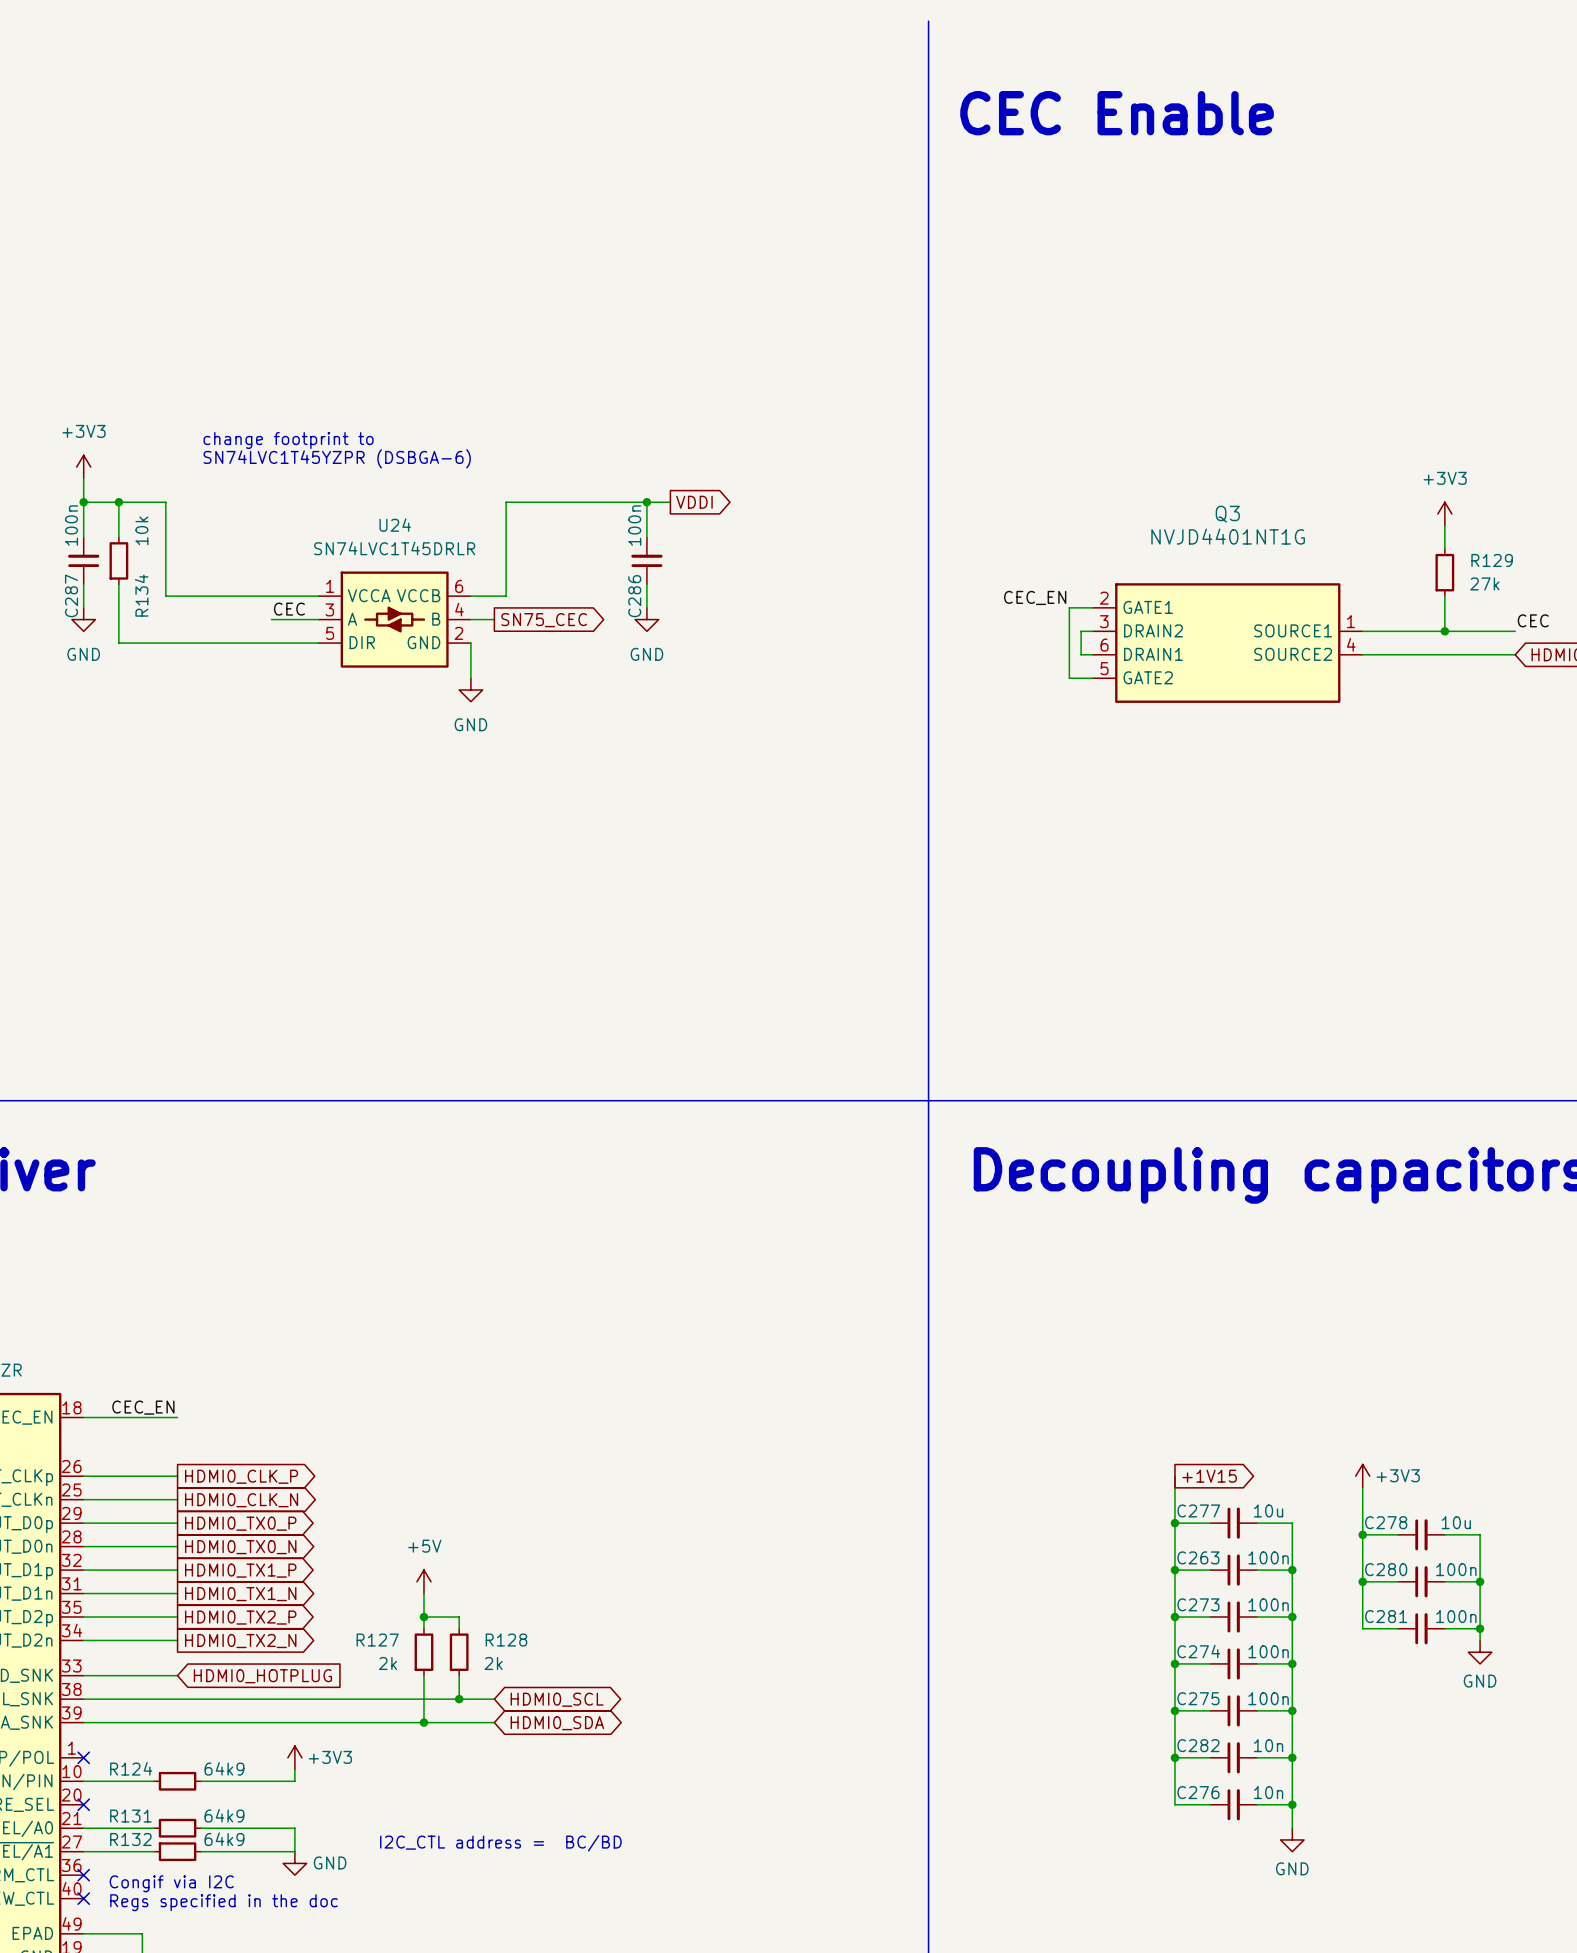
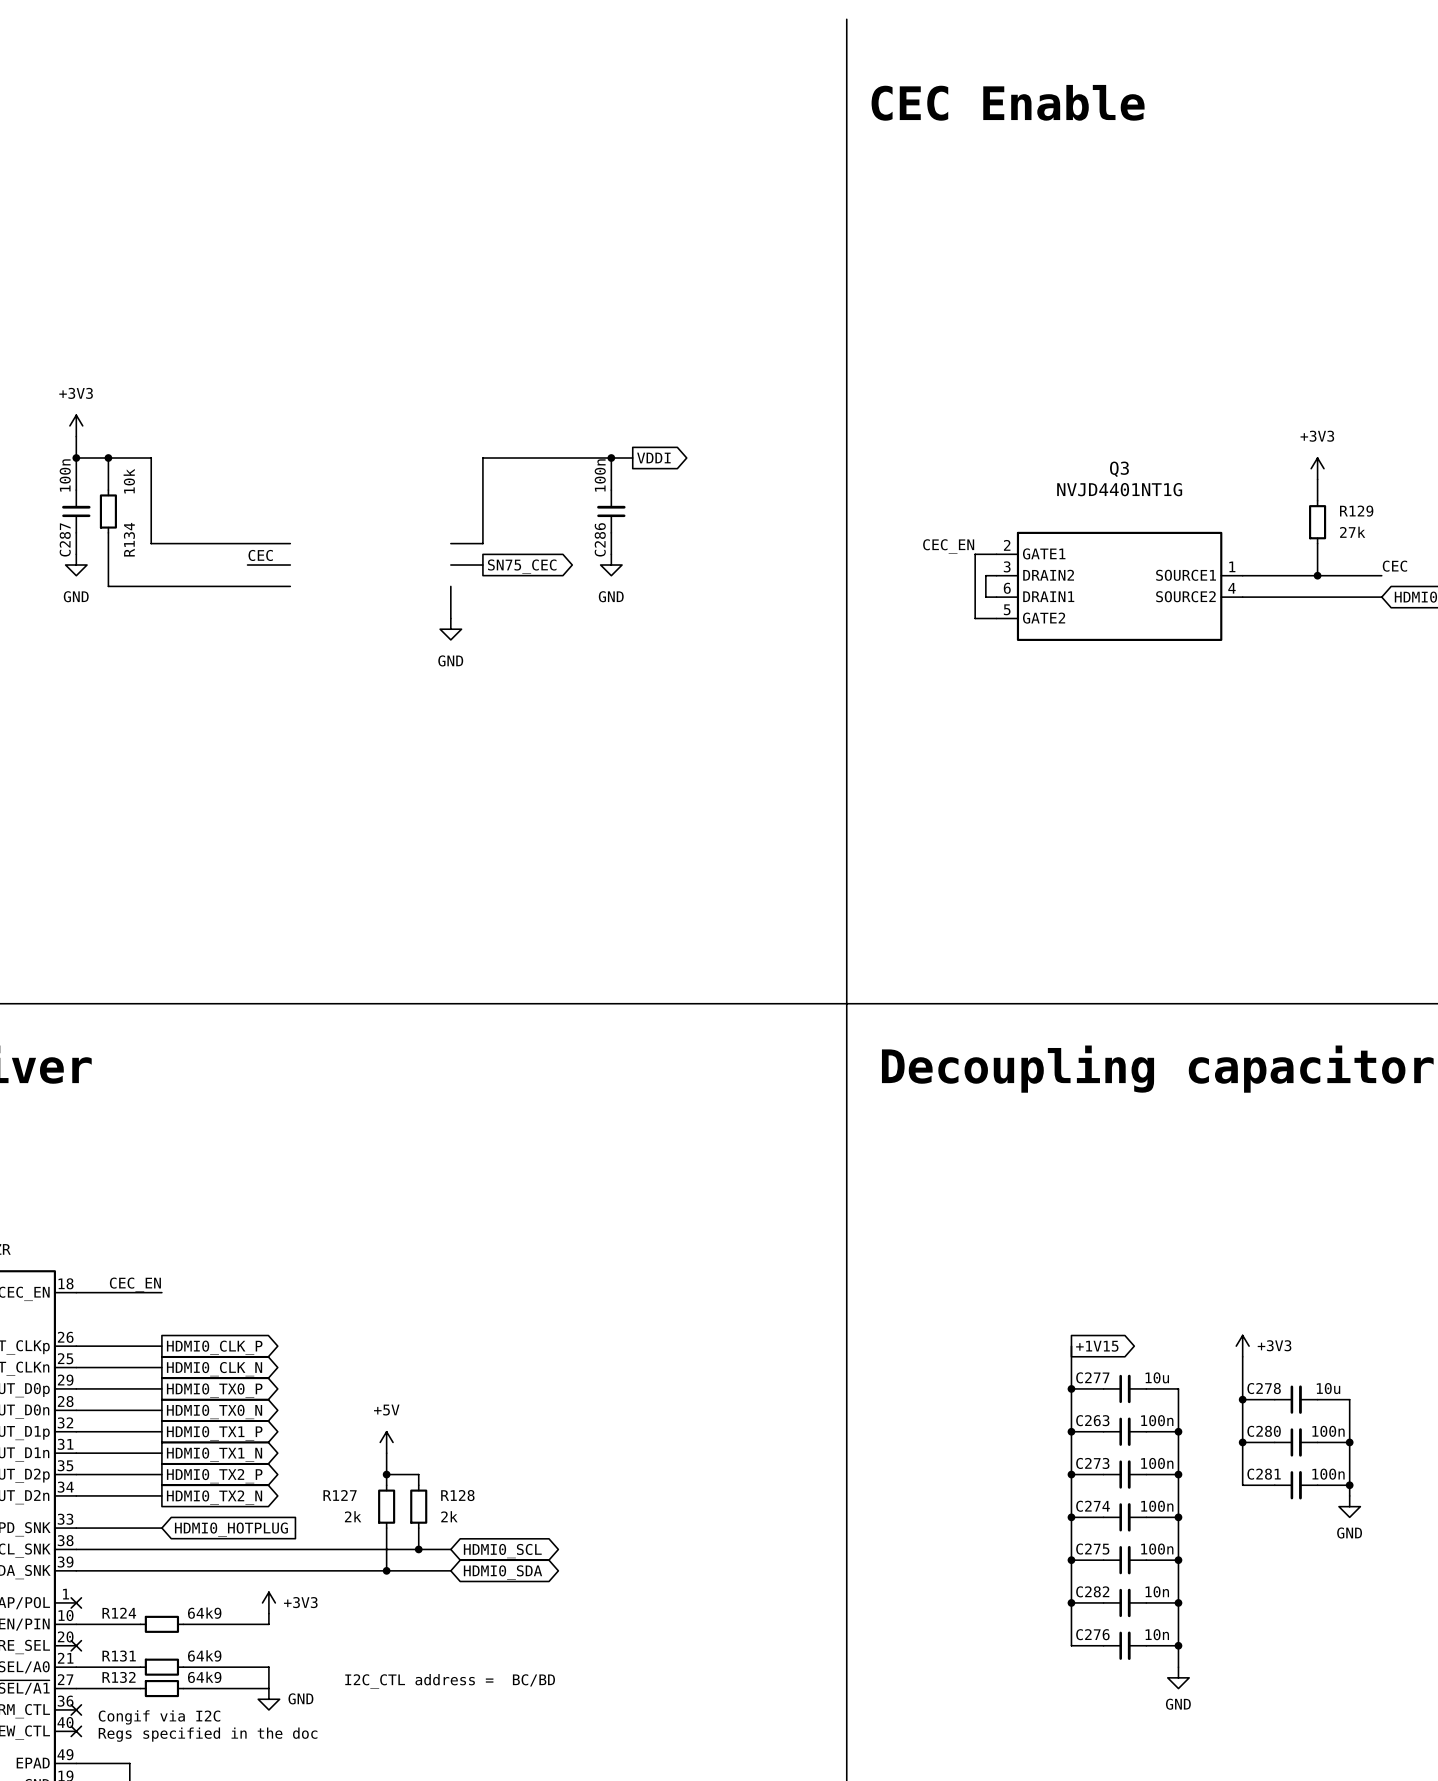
text: change footprint to (288, 440) -> none
text: SN74LVC1T45YZPR (DSBGA-6) (337, 458) -> none
wire: (529, 502) (506, 502) (506, 596) -> (482, 458) (482, 543) (461, 543)
wire: (646, 502) (646, 537) -> none
junction position: (646, 502) -> (611, 458)
wire: none -> (632, 458) (611, 458) (611, 490)
global label position: VDDI (694, 502) -> VDDI (653, 458)
C286 position: (646, 560) -> (611, 511)
wire: (646, 584) (646, 607) -> (611, 532) (611, 554)
wire: (470, 596) (494, 596) -> none
U24: (394, 619) -> none
wire: (470, 619) (494, 619) -> (482, 565) (450, 565)
power symbol position: GND (646, 619) -> GND (611, 565)
global label position: SN75_CEC (544, 620) -> SN75_CEC (522, 566)
wire: (470, 643) (470, 678) -> (450, 586) (450, 618)
power symbol position: GND (470, 689) -> GND (450, 629)

